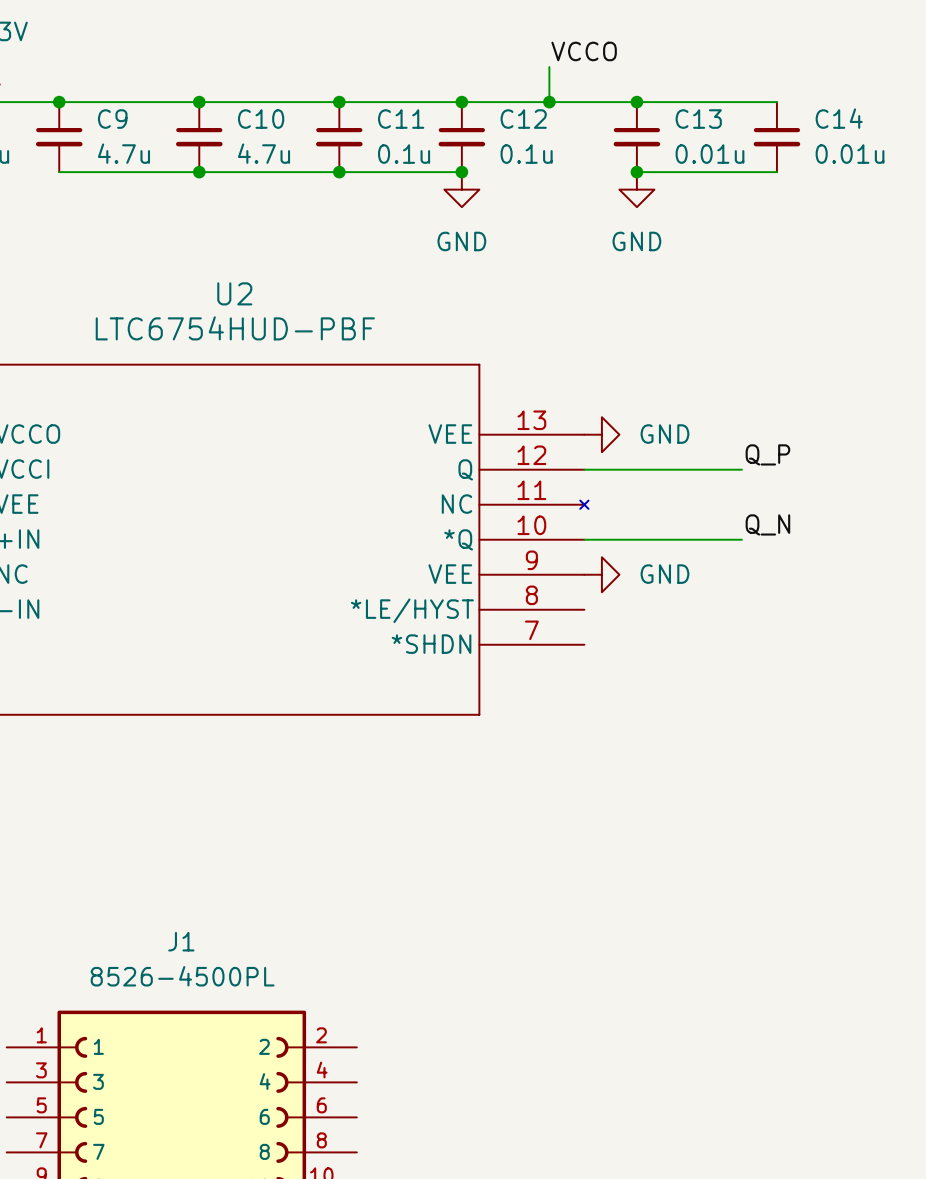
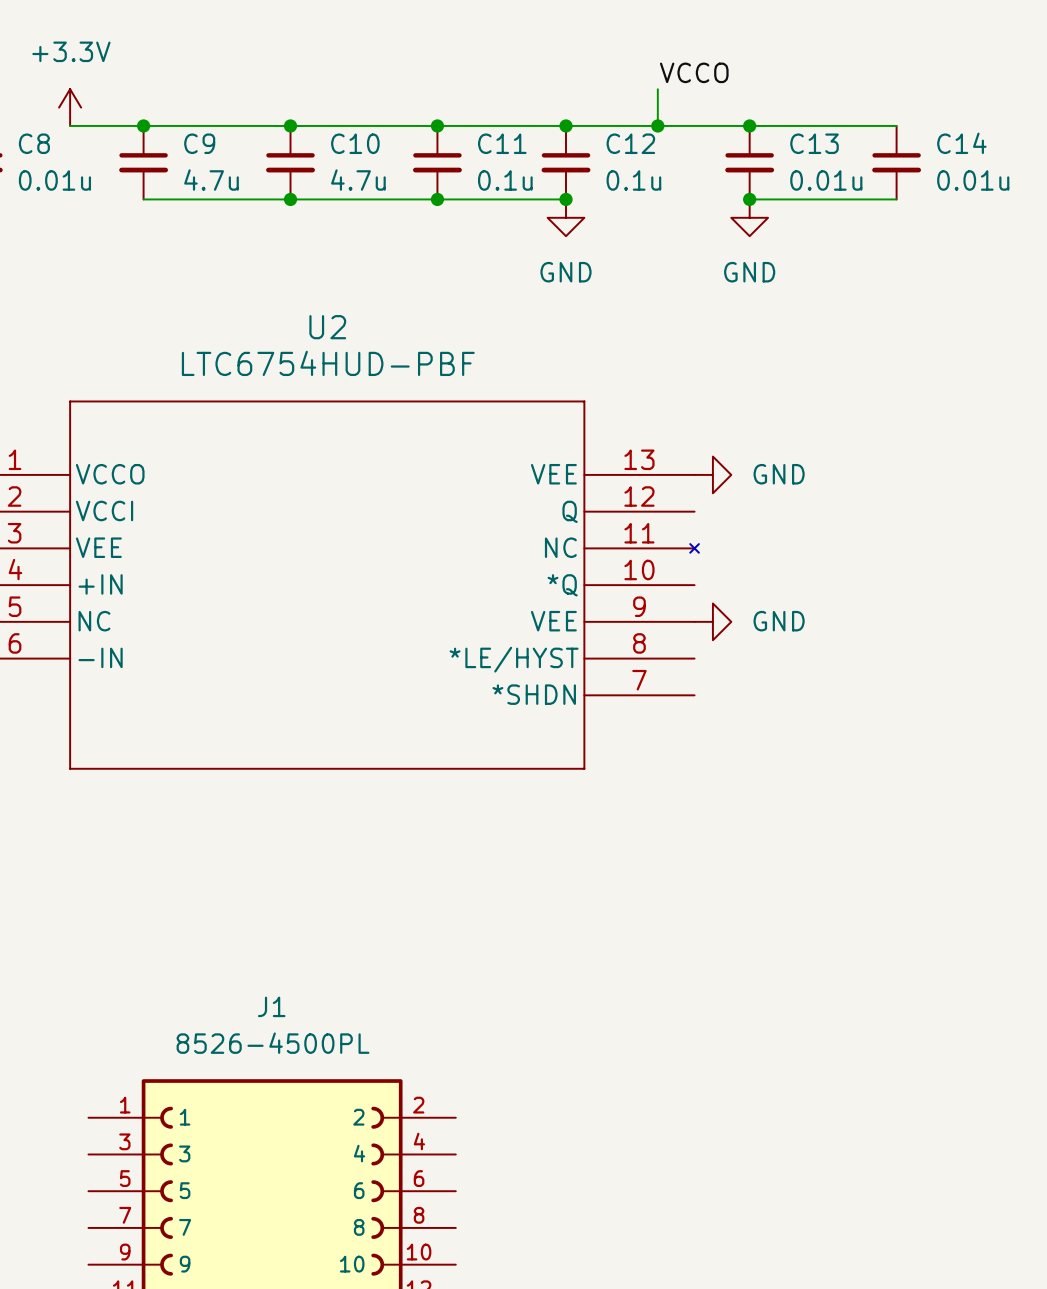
label: Q_P (767, 454) -> none
wire: (584, 469) (741, 469) -> none
label: Q_N (767, 524) -> none
wire: (584, 539) (741, 539) -> none

